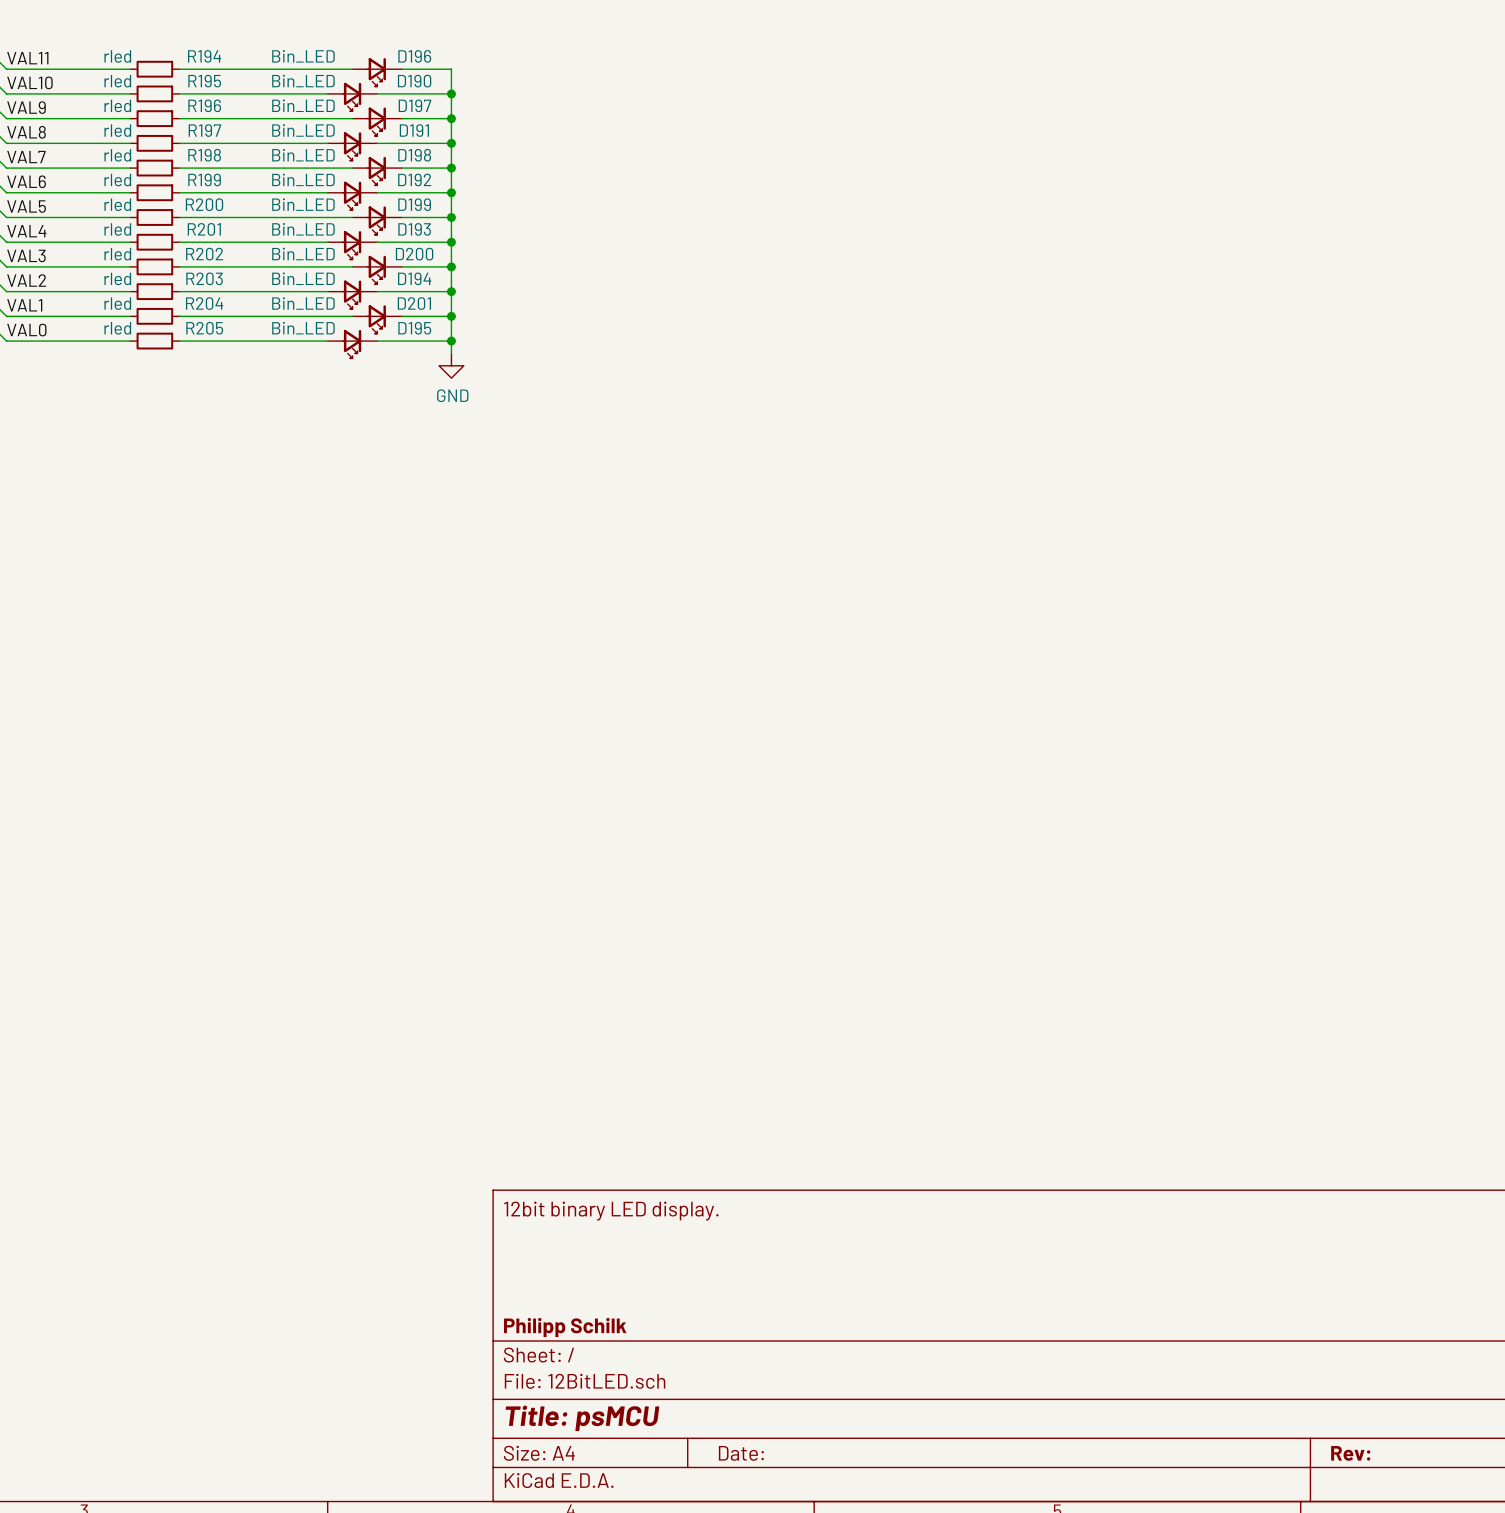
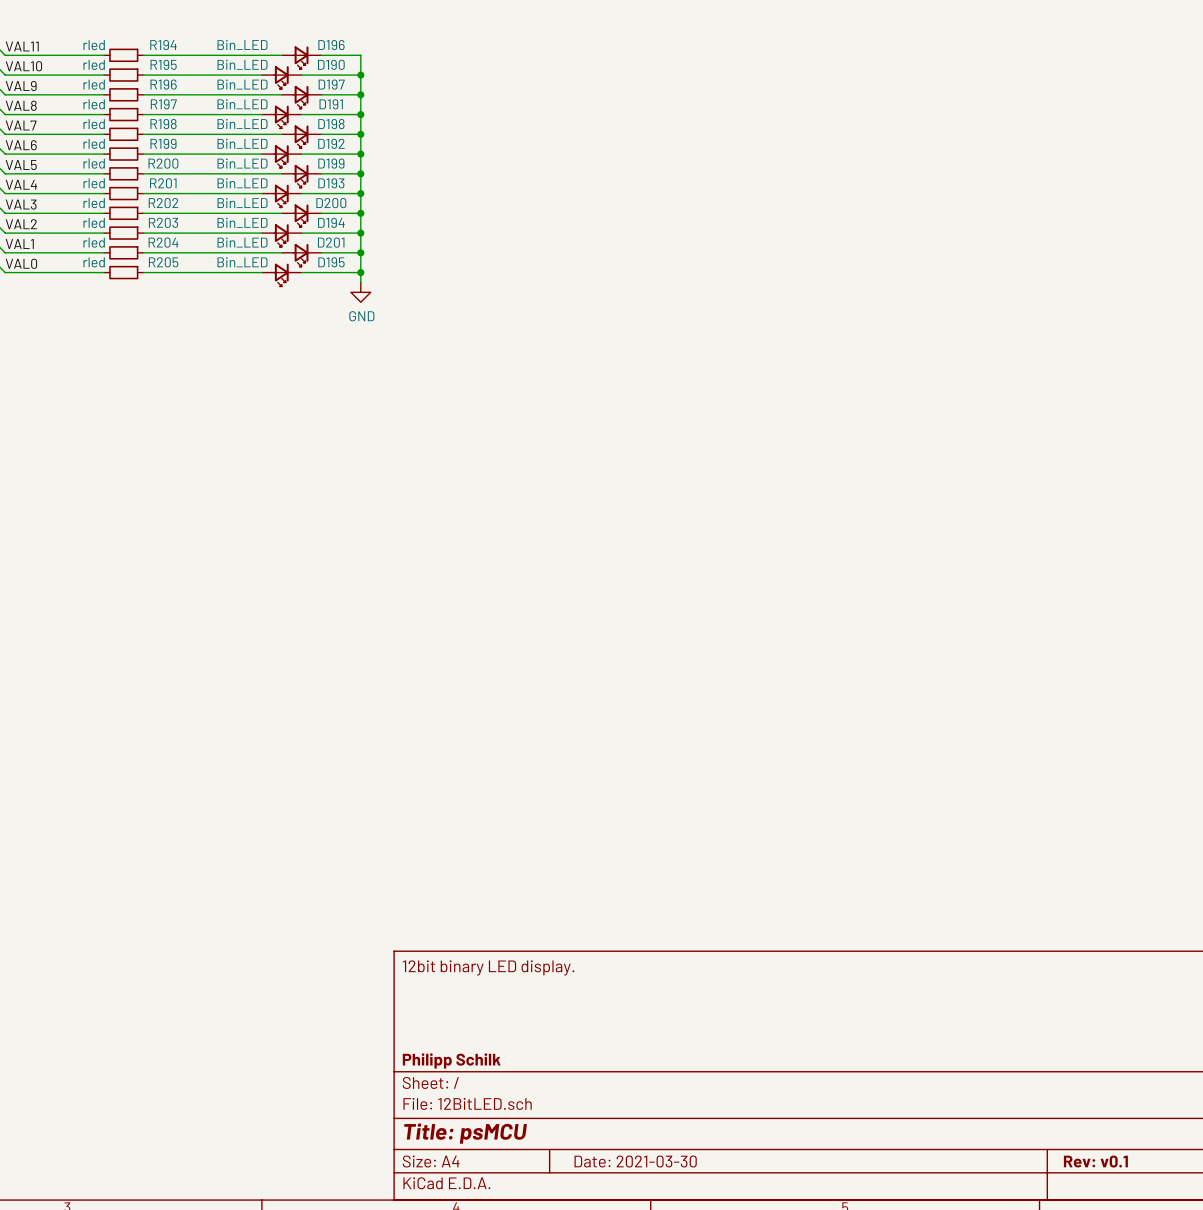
title block: Date: (741, 1453) -> Date: 2021-03-30 (635, 1161)
title block: Rev: (1350, 1453) -> Rev: v0.1 (1095, 1161)

